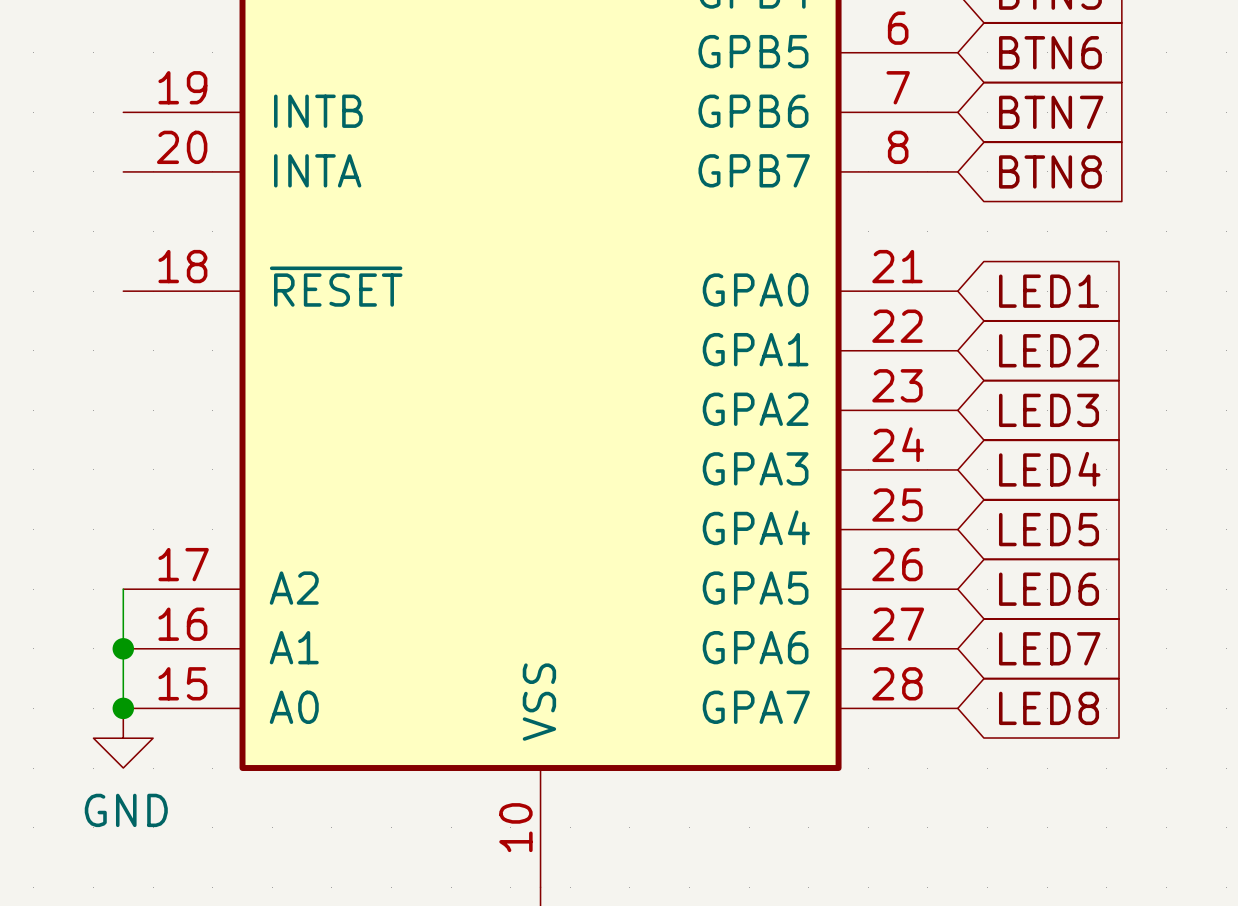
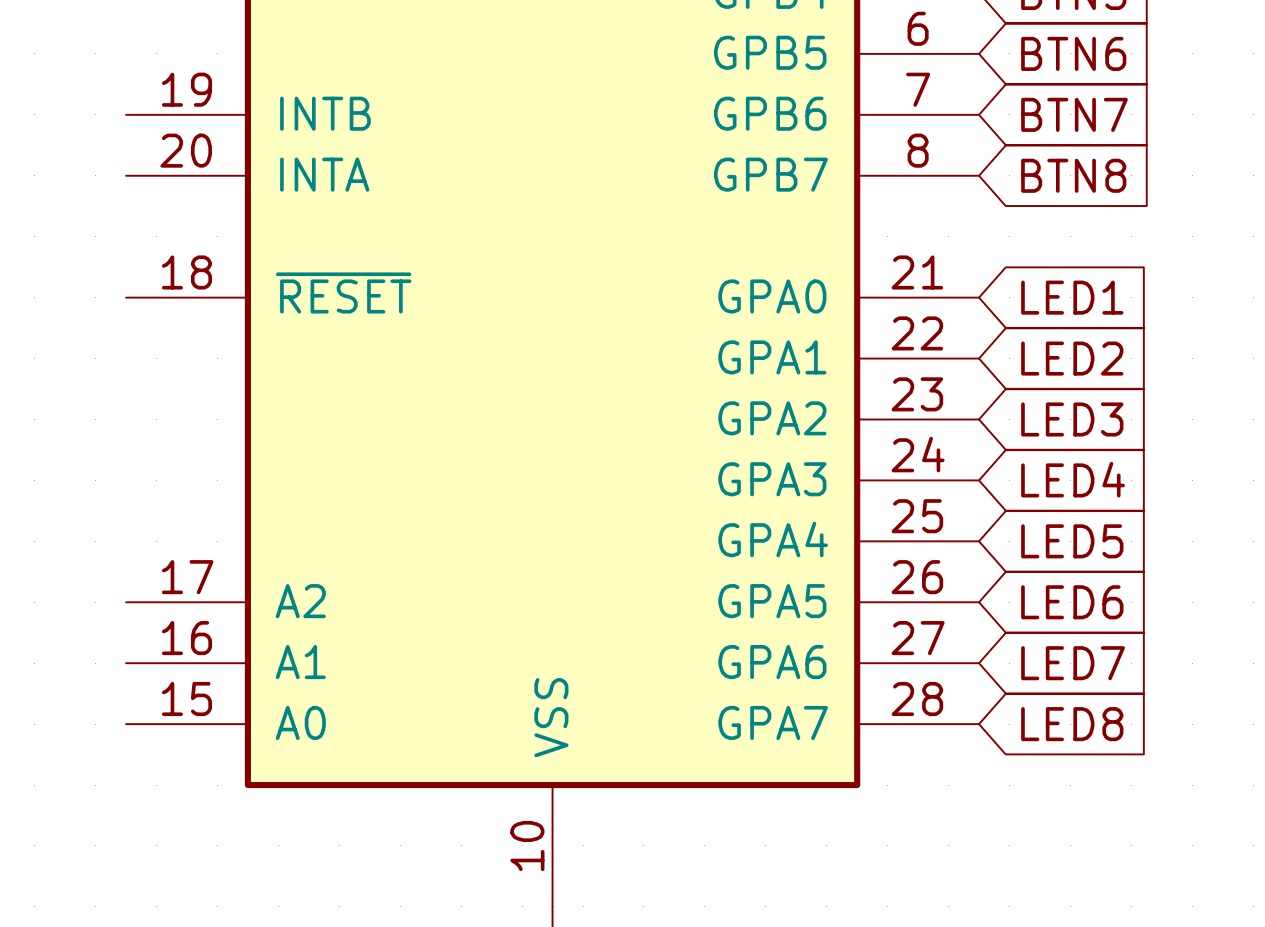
wire: (123, 589) (123, 708) -> none
junction: (123, 648) -> none
junction: (123, 708) -> none
power symbol: GND (123, 738) -> none

